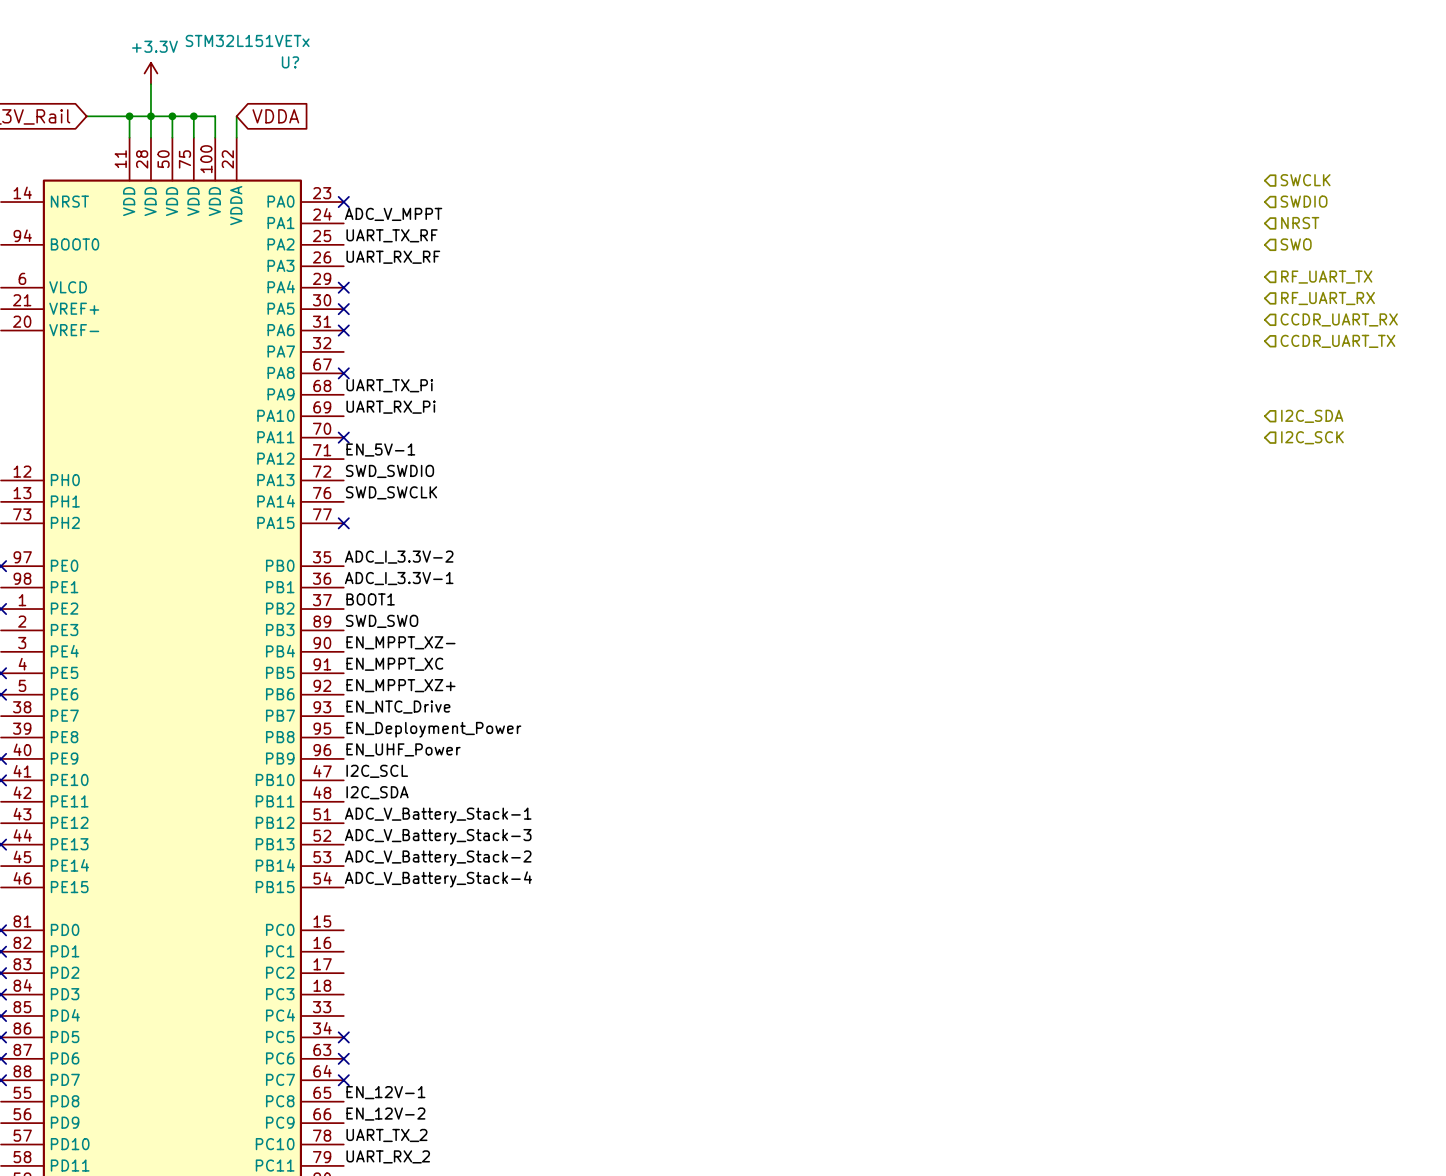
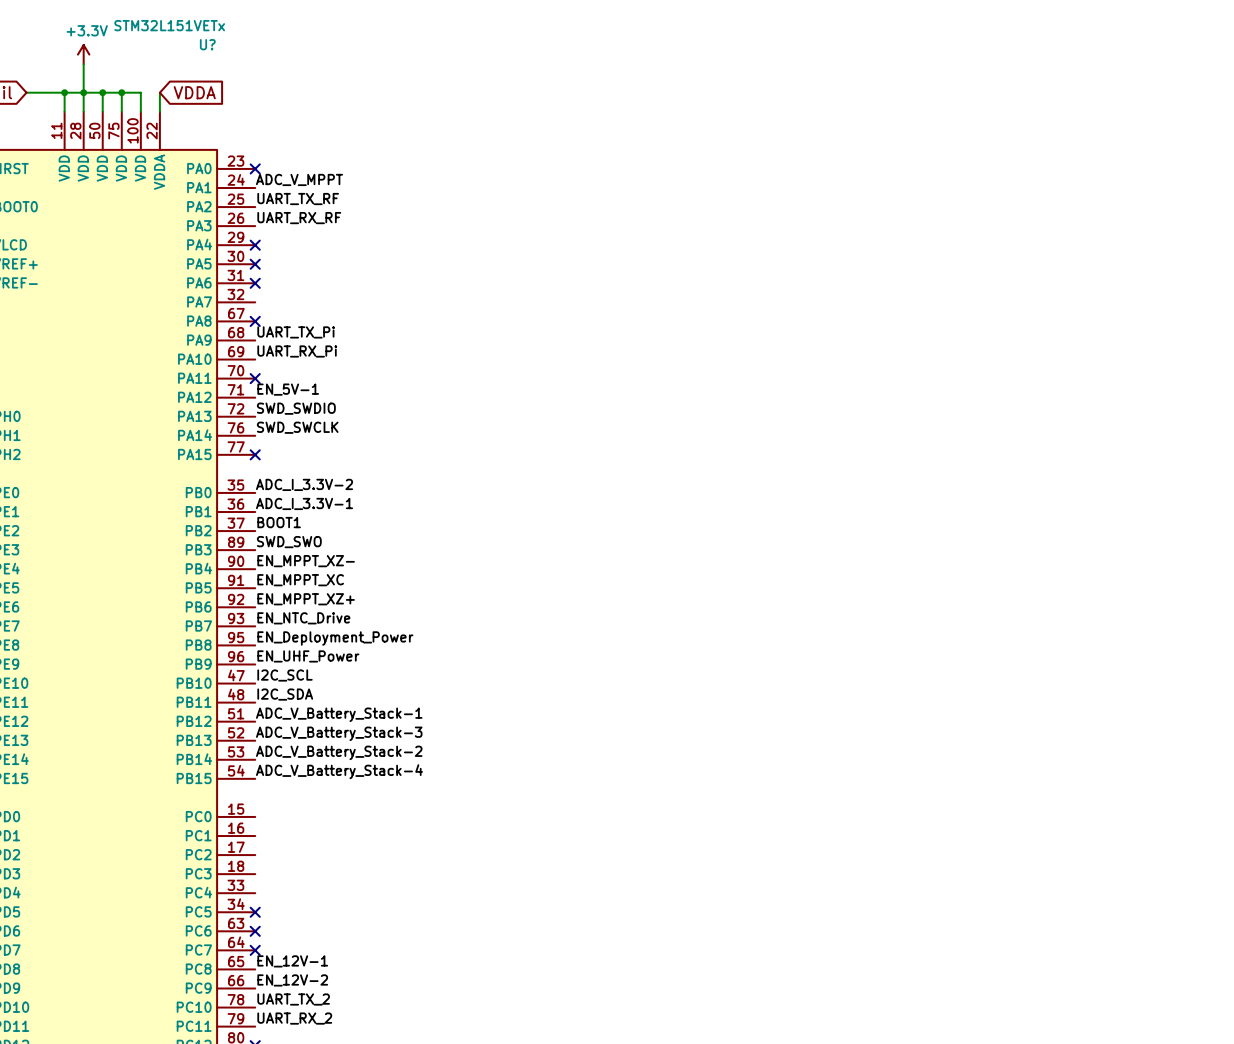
hierarchical label: SWCLK (1305, 180) -> none
hierarchical label: SWDIO (1304, 201) -> none
hierarchical label: NRST (1300, 223) -> none
hierarchical label: SWO (1296, 244) -> none
hierarchical label: RF_UART_TX (1326, 277) -> none
hierarchical label: RF_UART_RX (1328, 298) -> none
hierarchical label: CCDR_UART_RX (1339, 319) -> none
hierarchical label: CCDR_UART_TX (1337, 341) -> none
hierarchical label: I2C_SDA (1312, 416) -> none
hierarchical label: I2C_SCK (1312, 437) -> none

